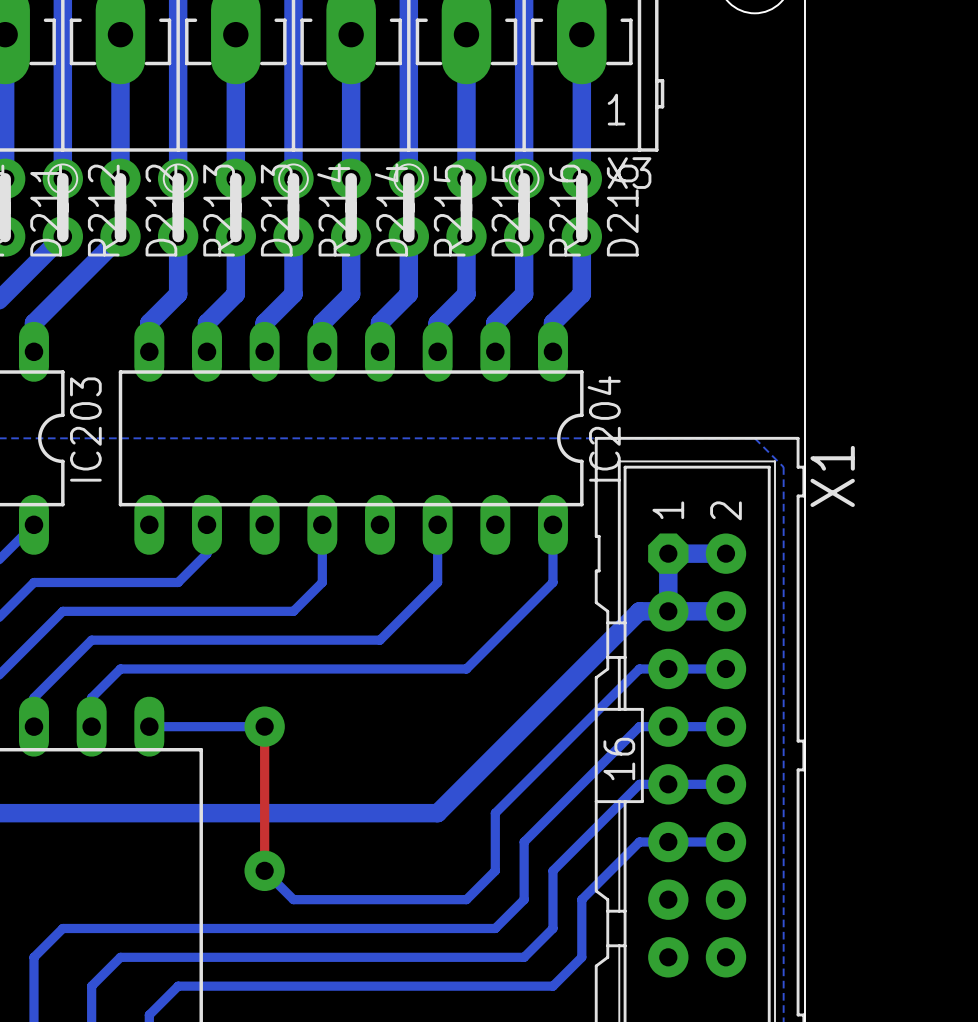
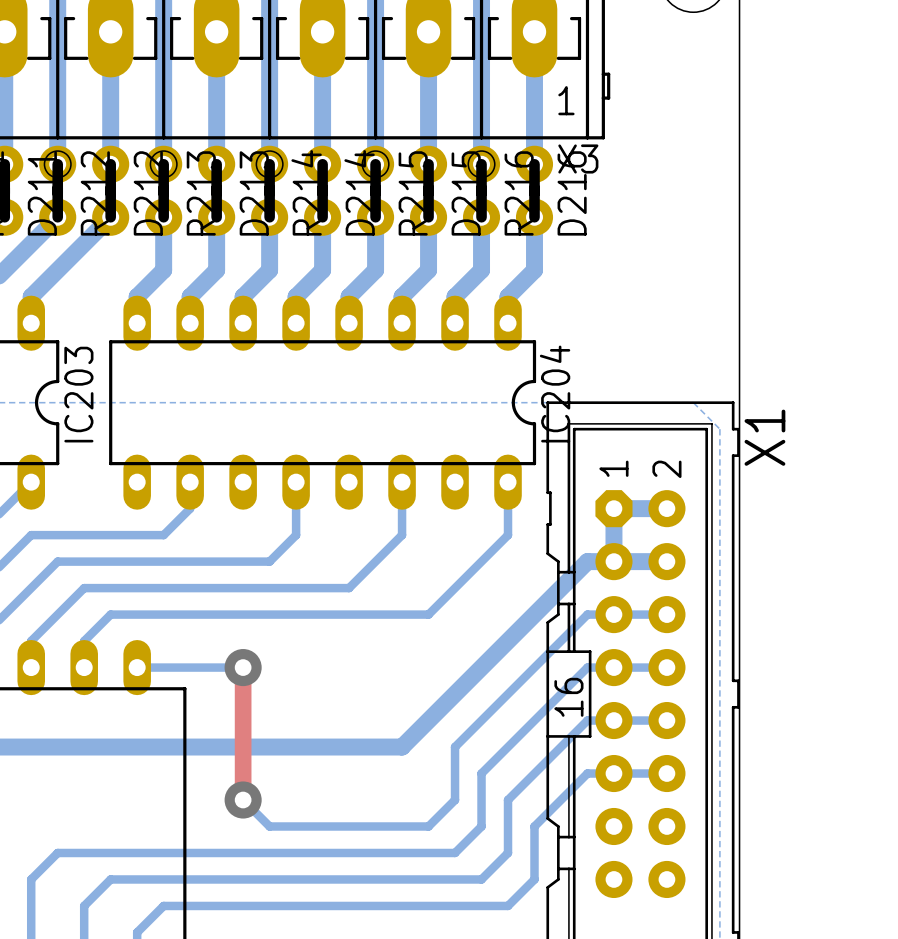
top track width: thin (264, 726) (264, 870) -> thick (243, 667) (243, 800)

